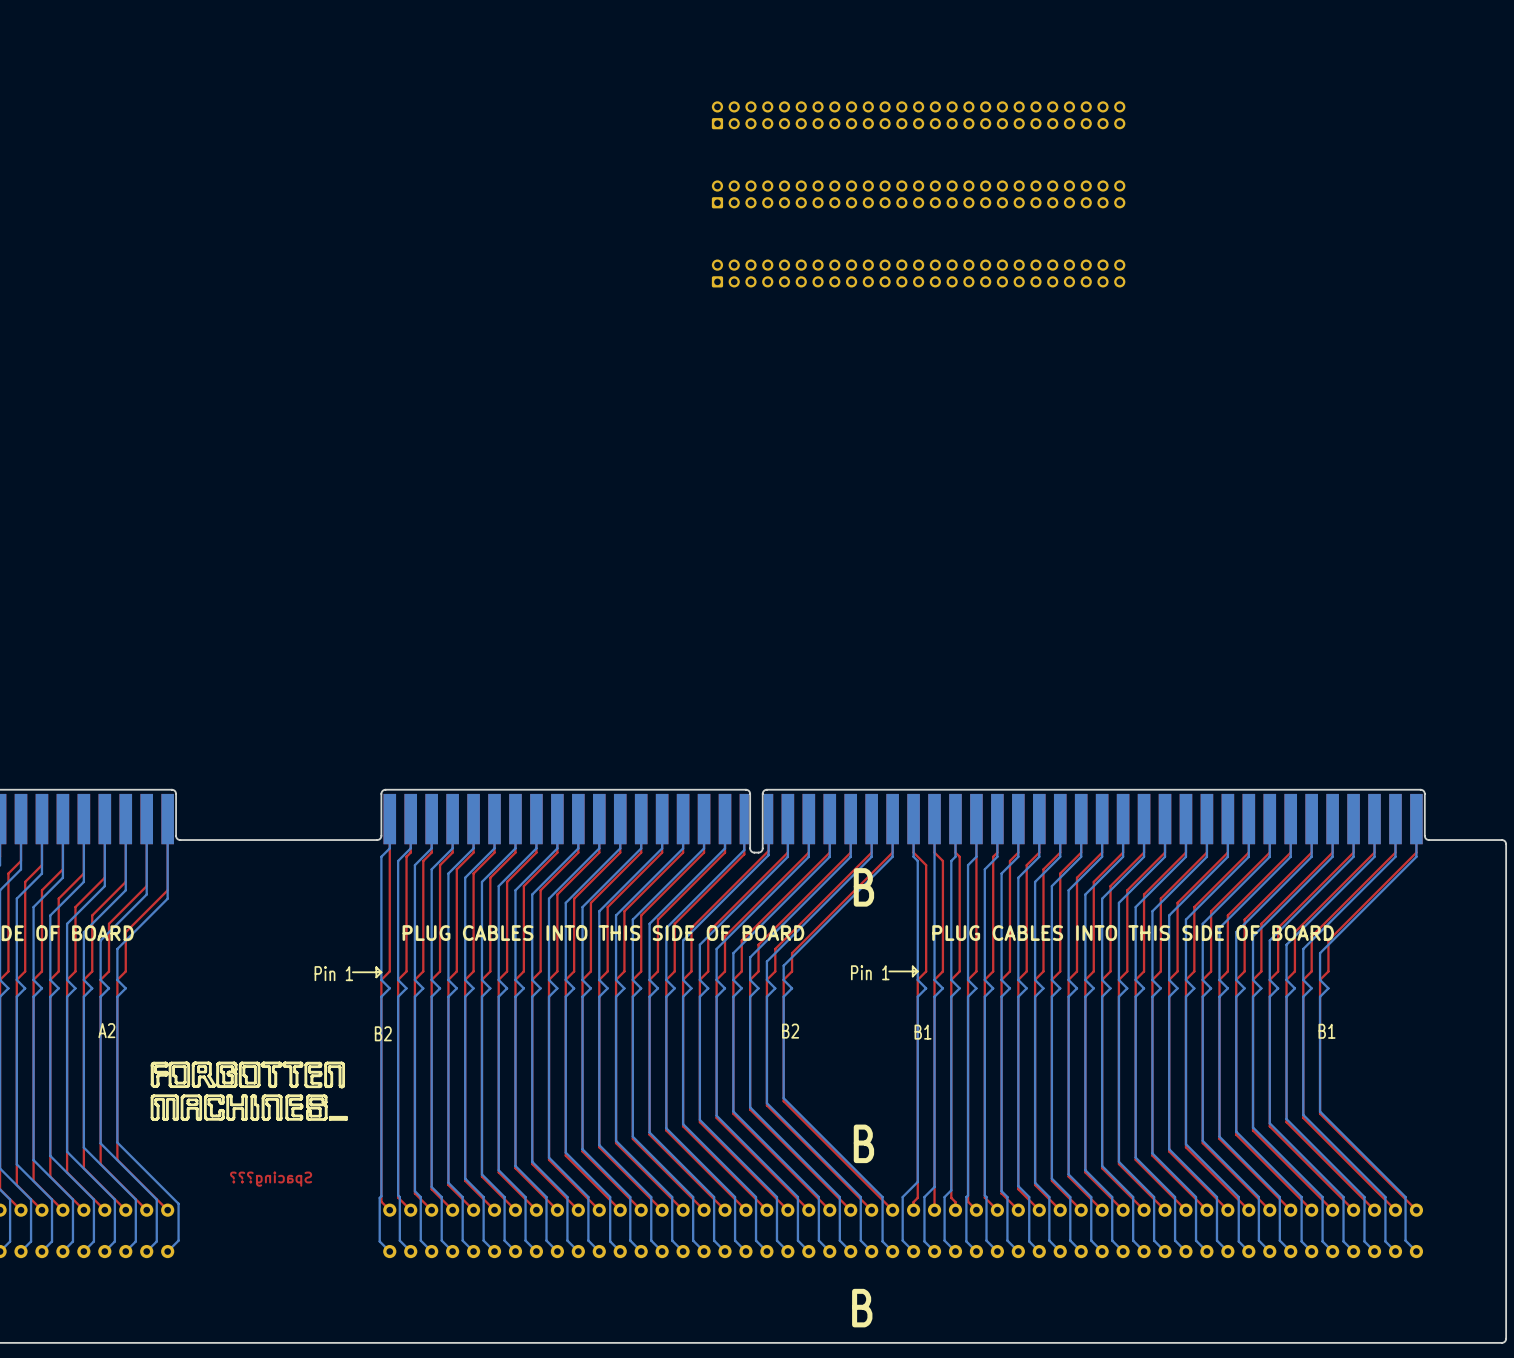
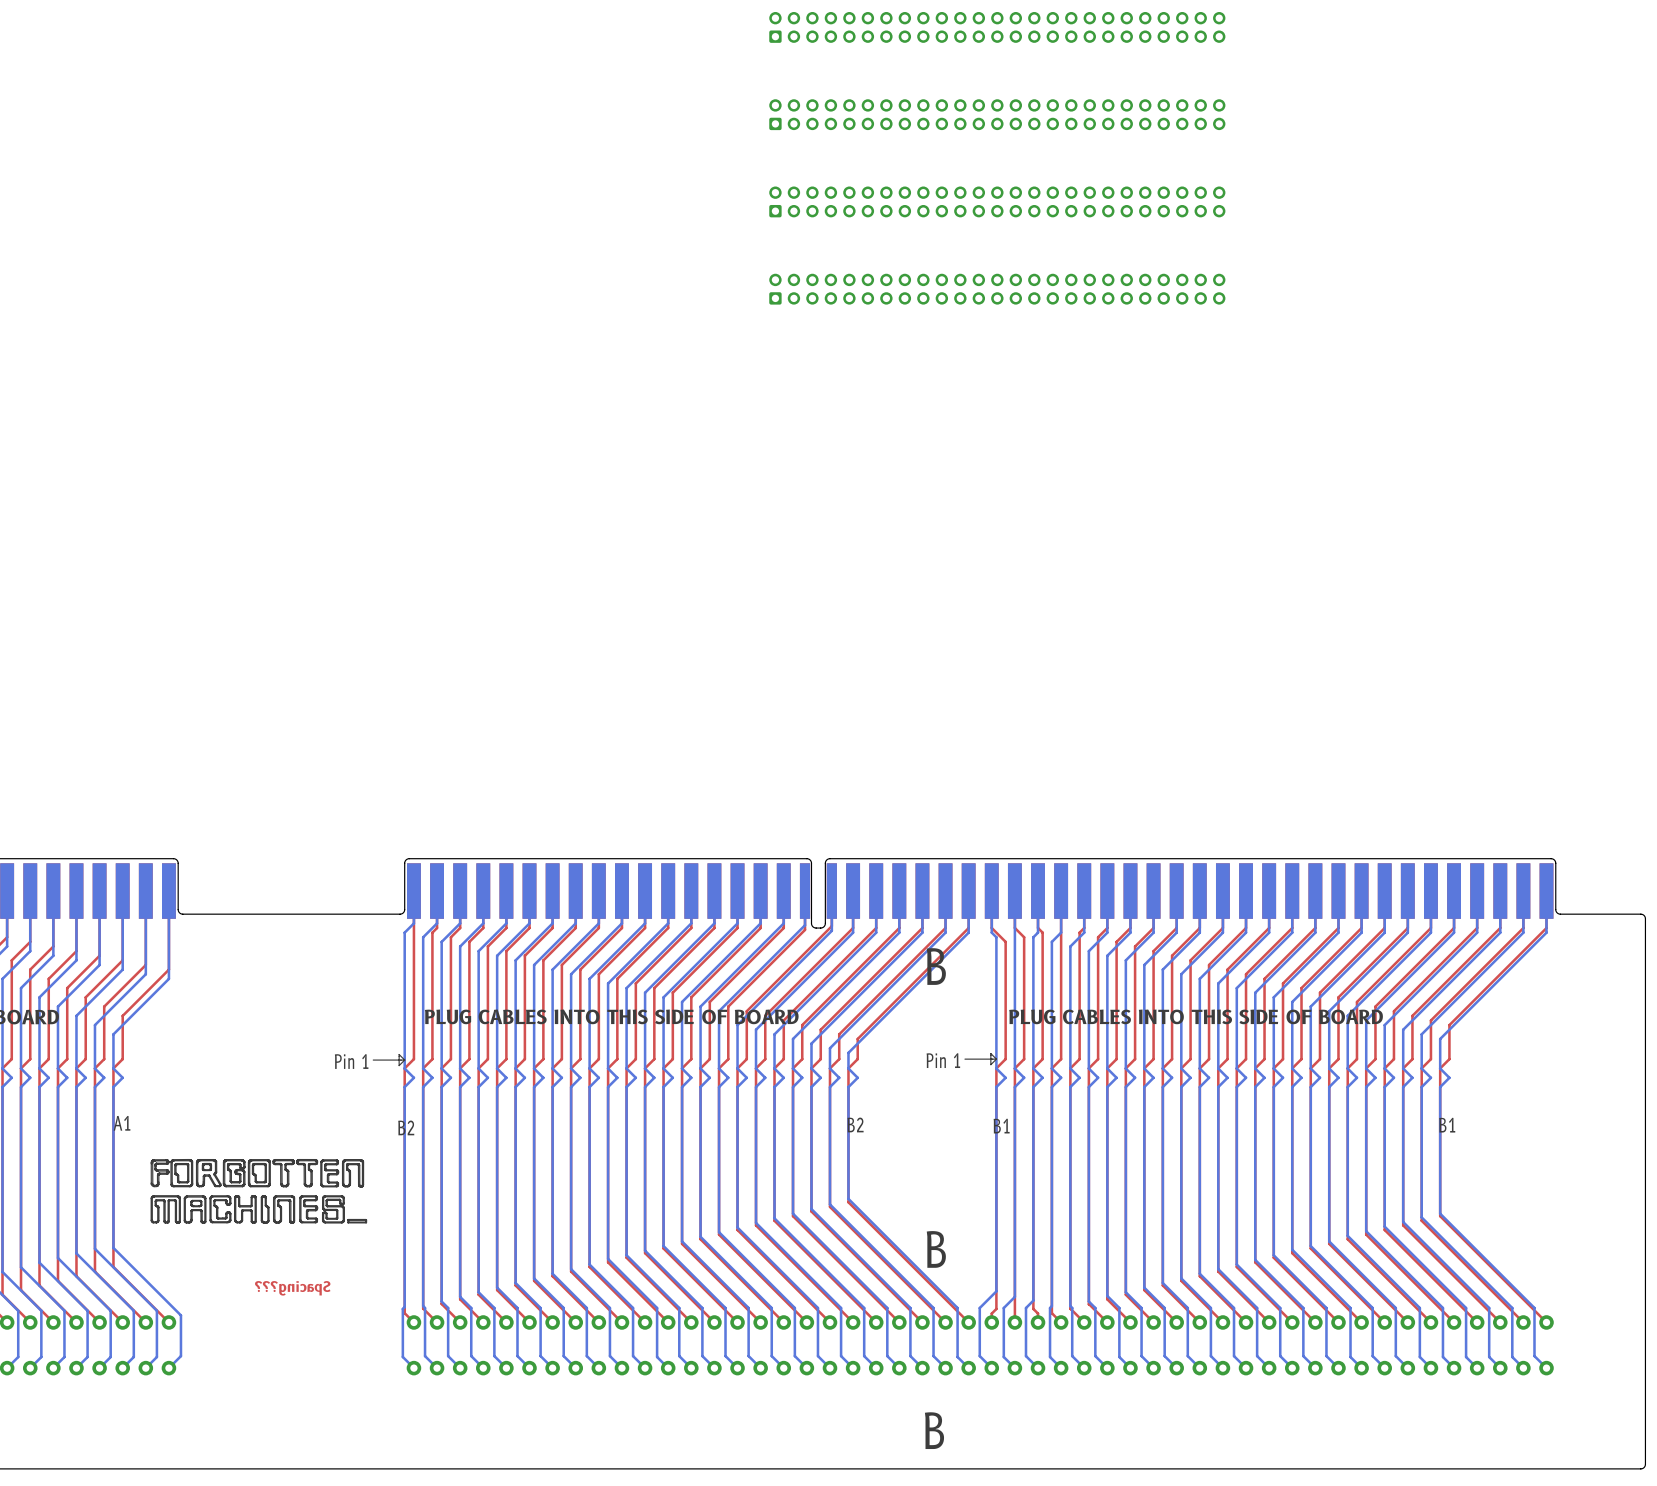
part: none -> (997, 27)
text: none -> A1 (122, 1123)
text: A2 (106, 1030) -> none

